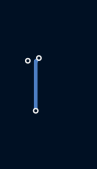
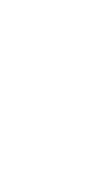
track: (38, 58) (35, 61) (35, 110) -> none
via: (38, 58) -> none
via: (27, 60) -> none
via: (35, 110) -> none

